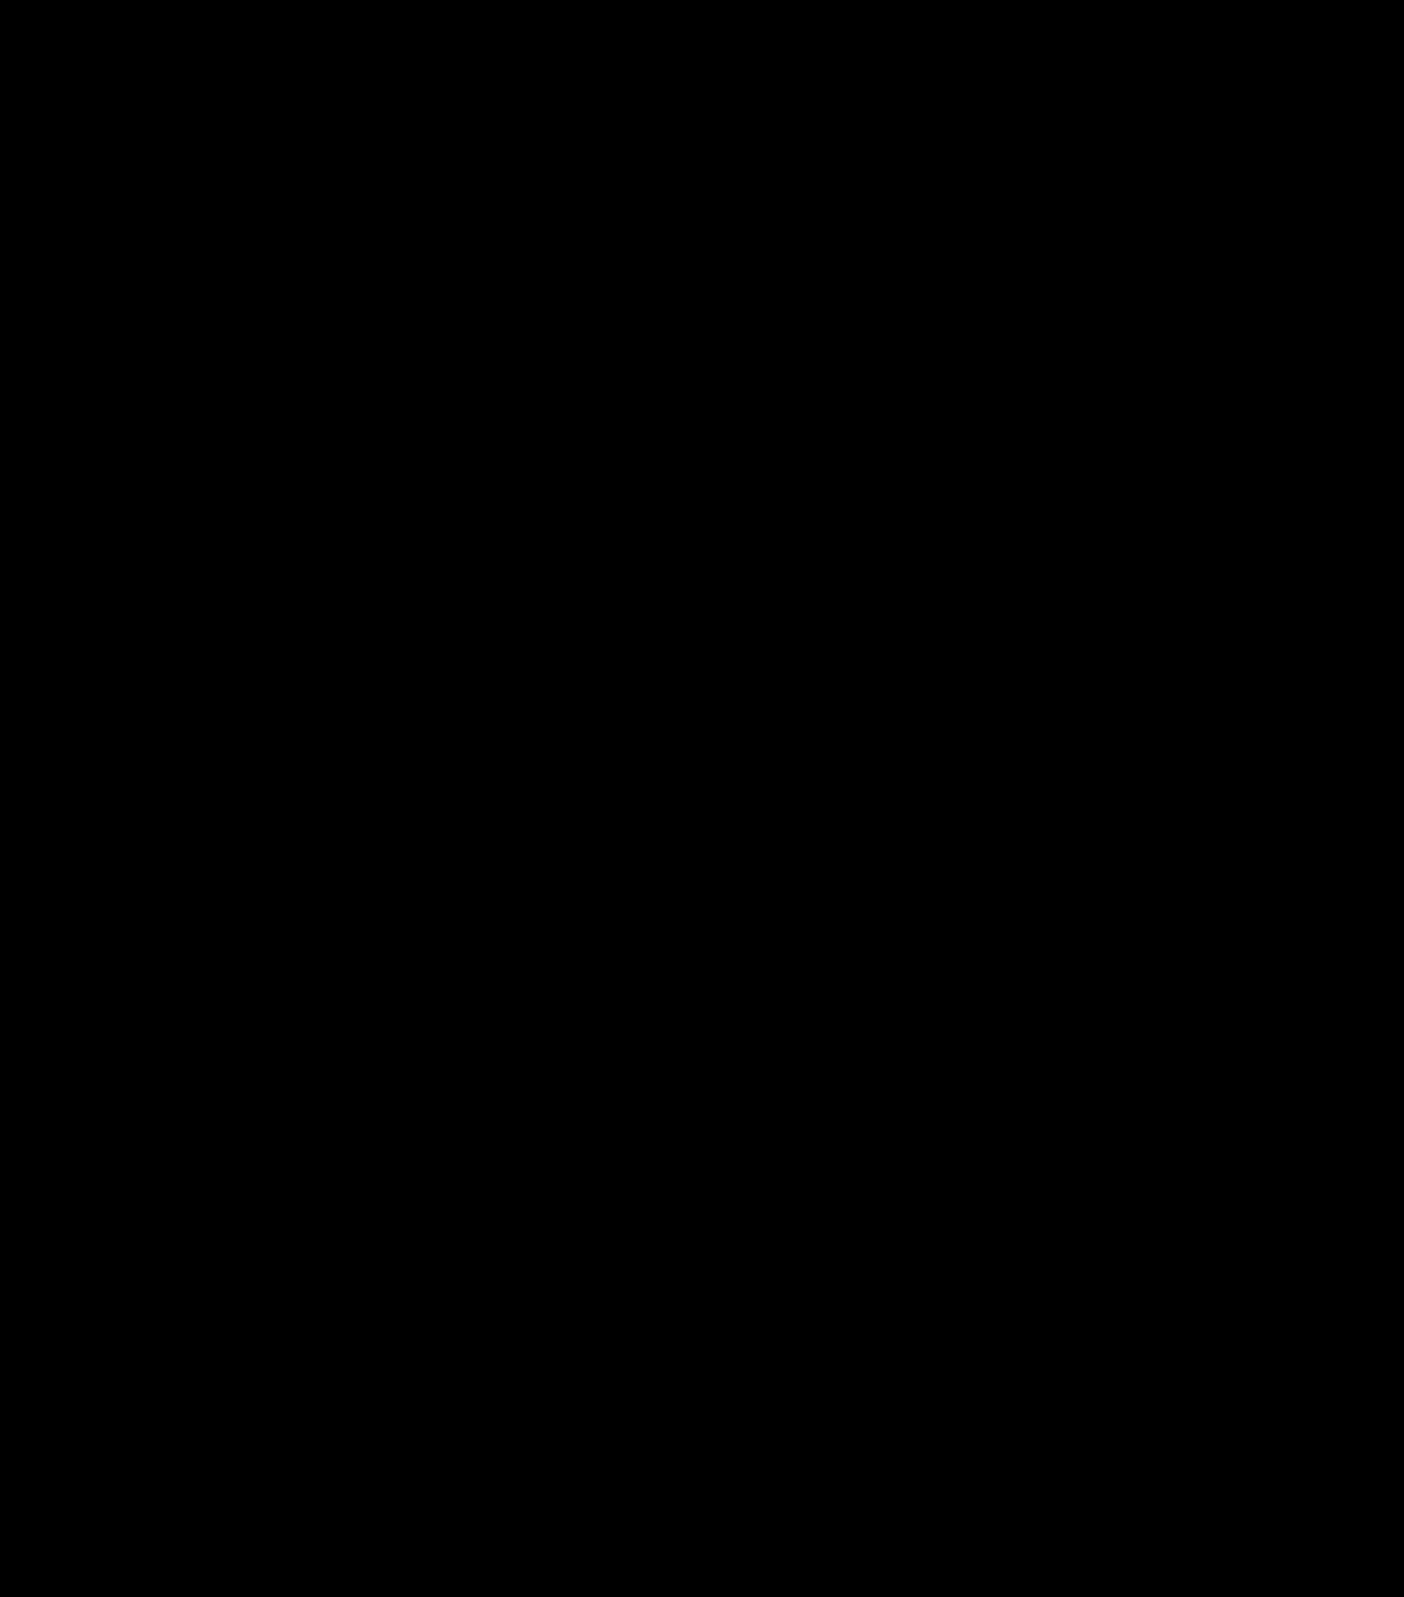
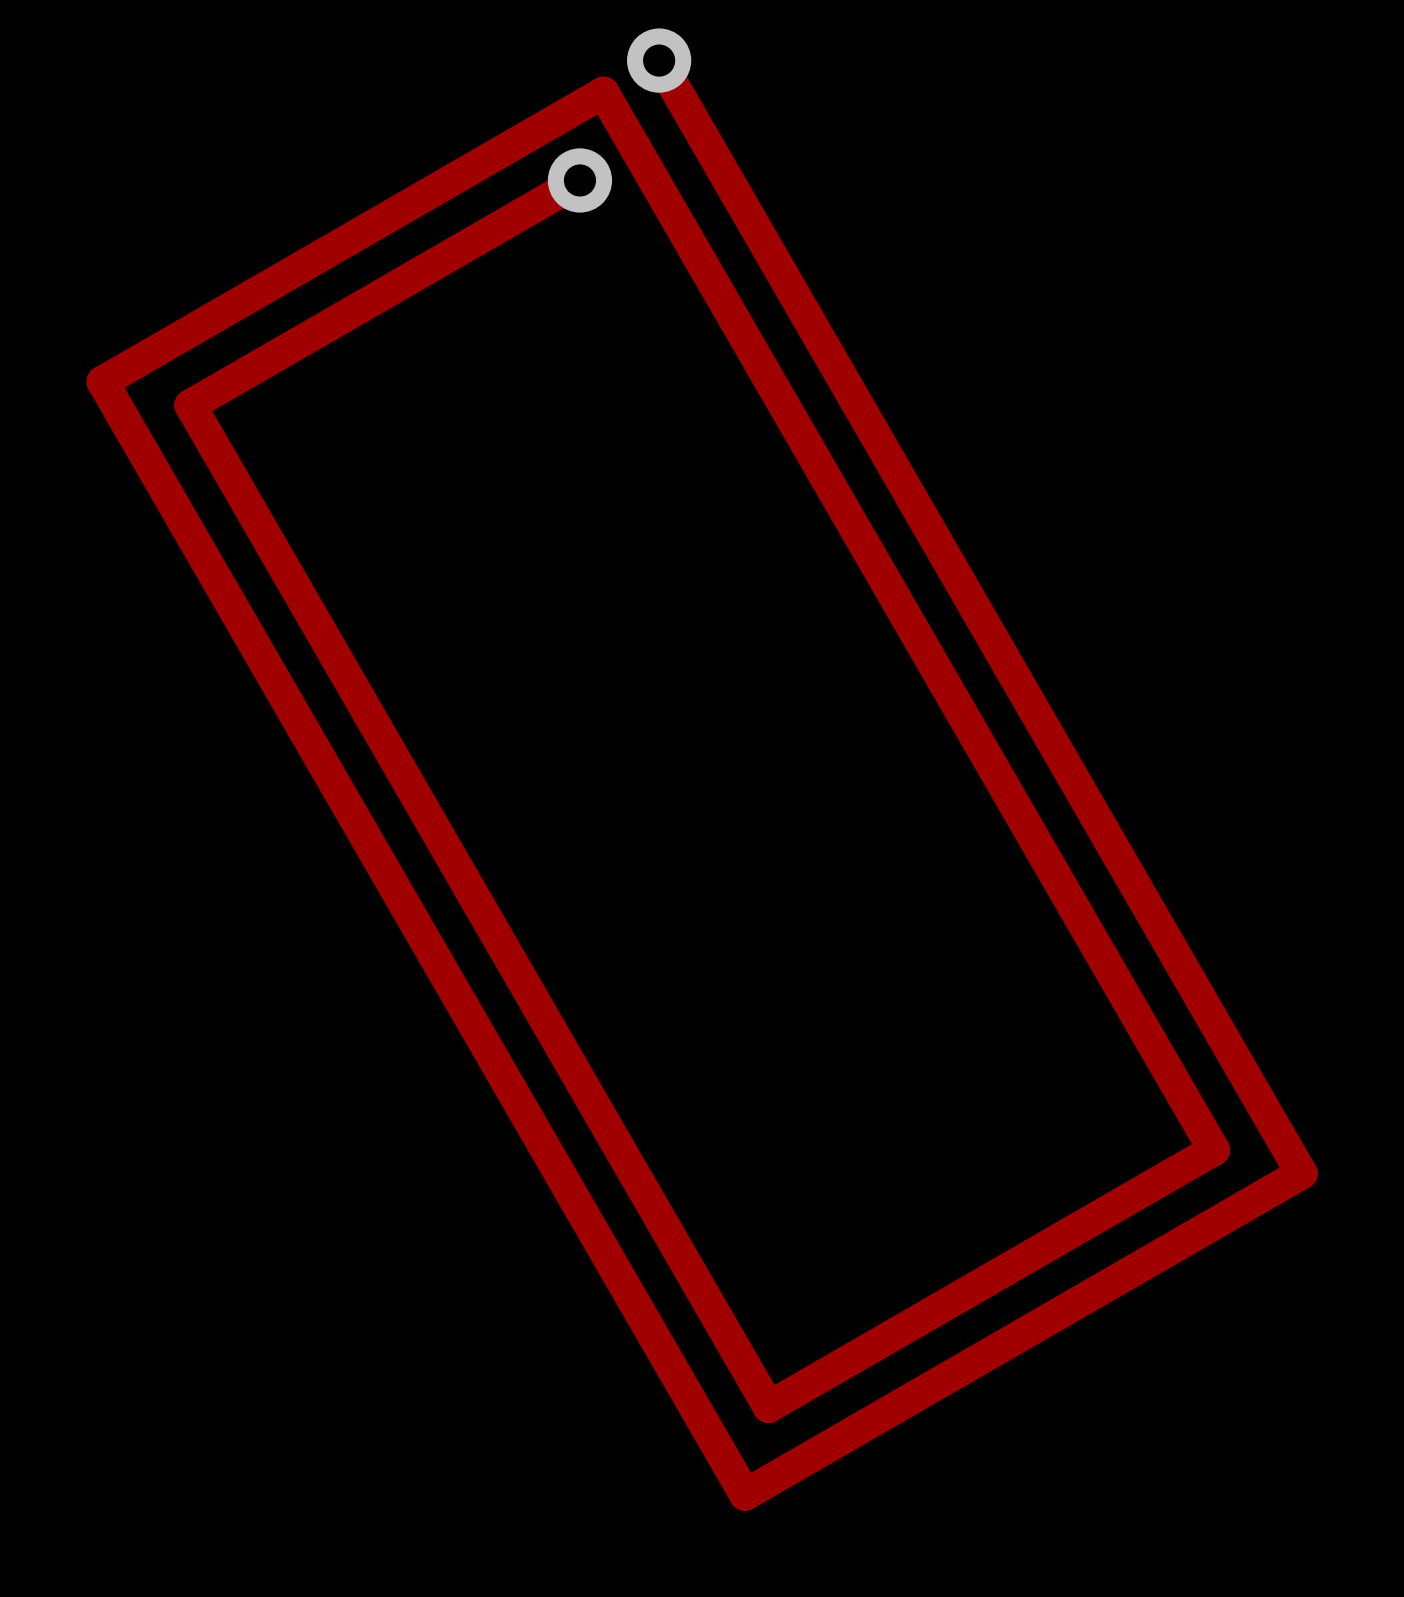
top track: none -> (659, 60) (1301, 1173) (745, 1494) (102, 381) (603, 92) (1213, 1149) (768, 1406) (190, 405) (579, 180)
via: none -> (659, 60)
via: none -> (579, 180)

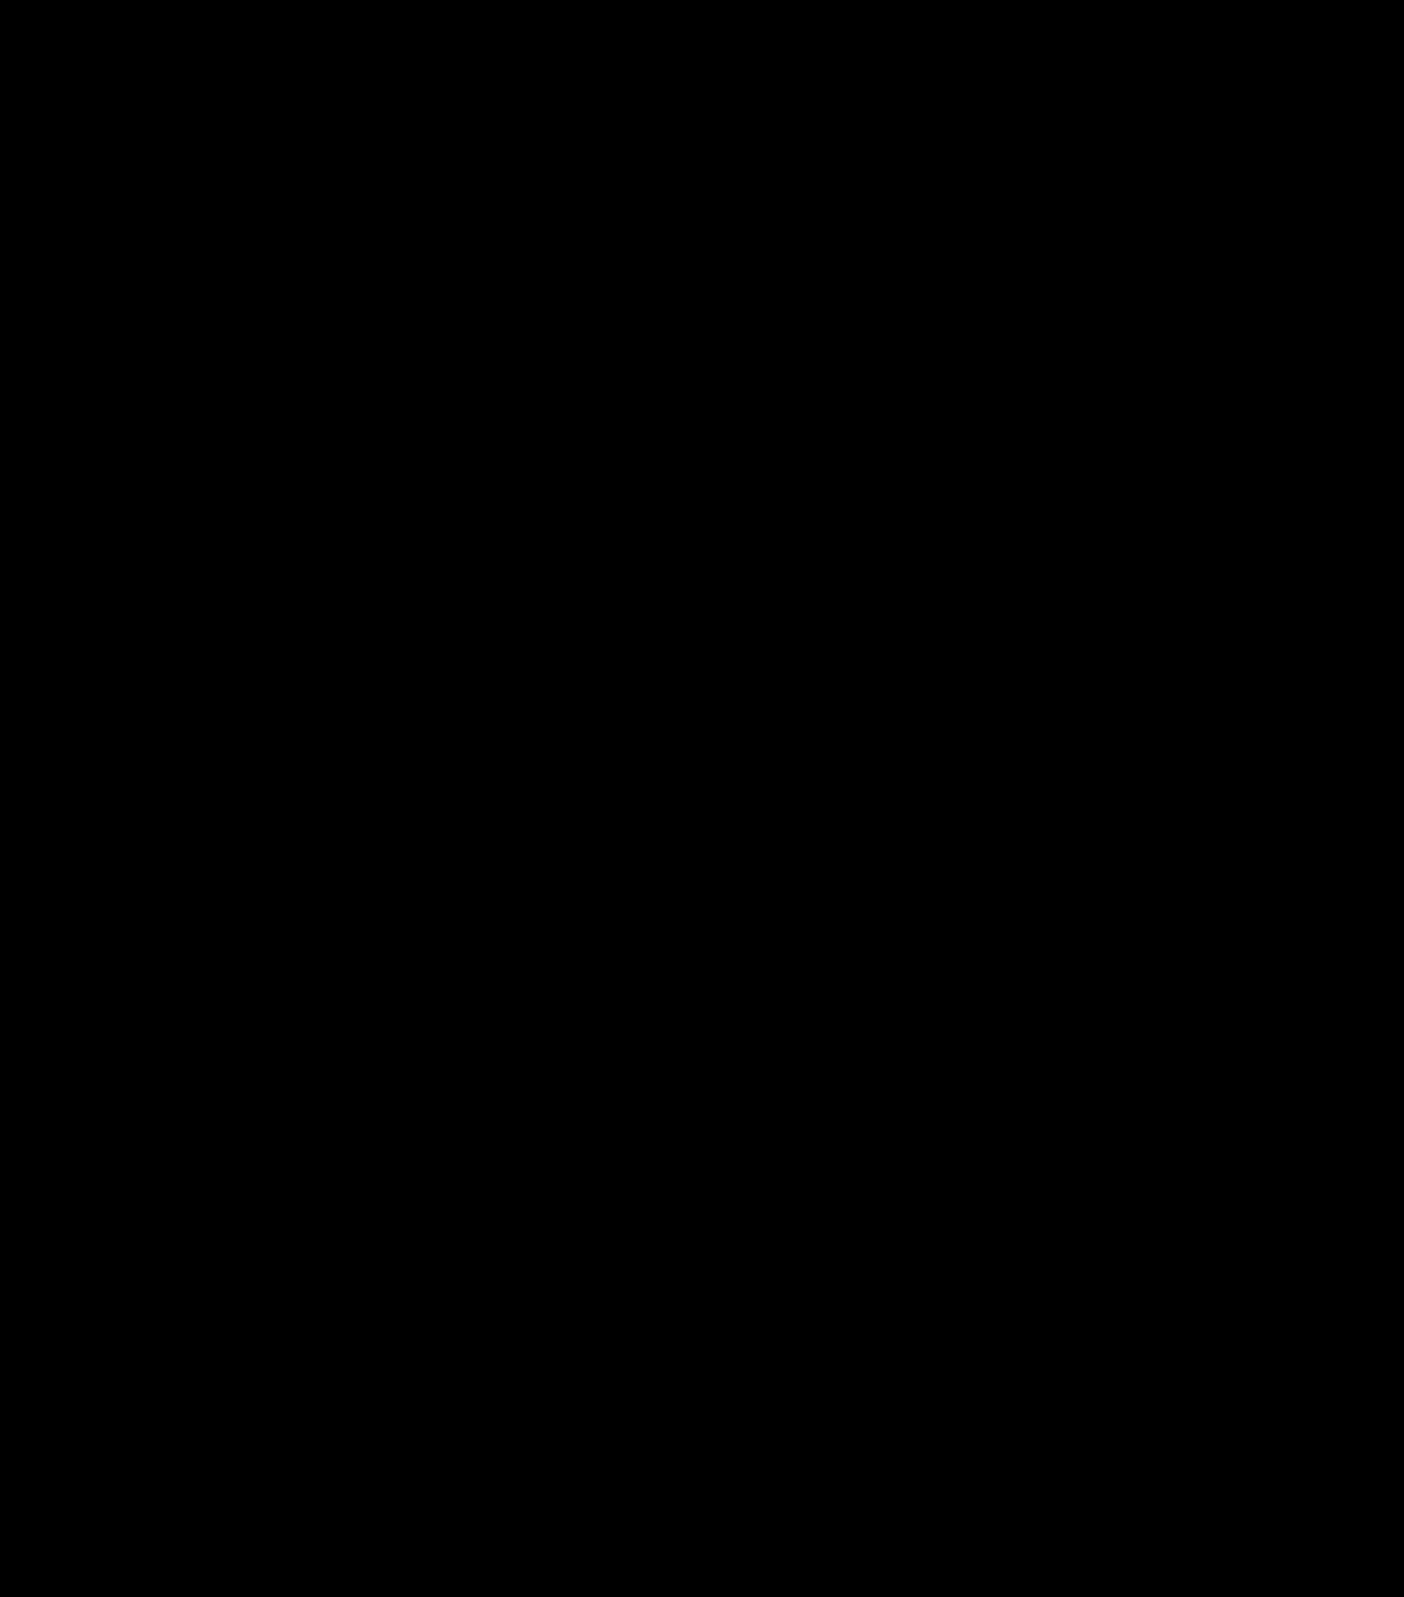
top track: (659, 60) (1301, 1173) (745, 1494) (102, 381) (603, 92) (1213, 1149) (768, 1406) (190, 405) (579, 180) -> none
via: (659, 60) -> none
via: (579, 180) -> none

